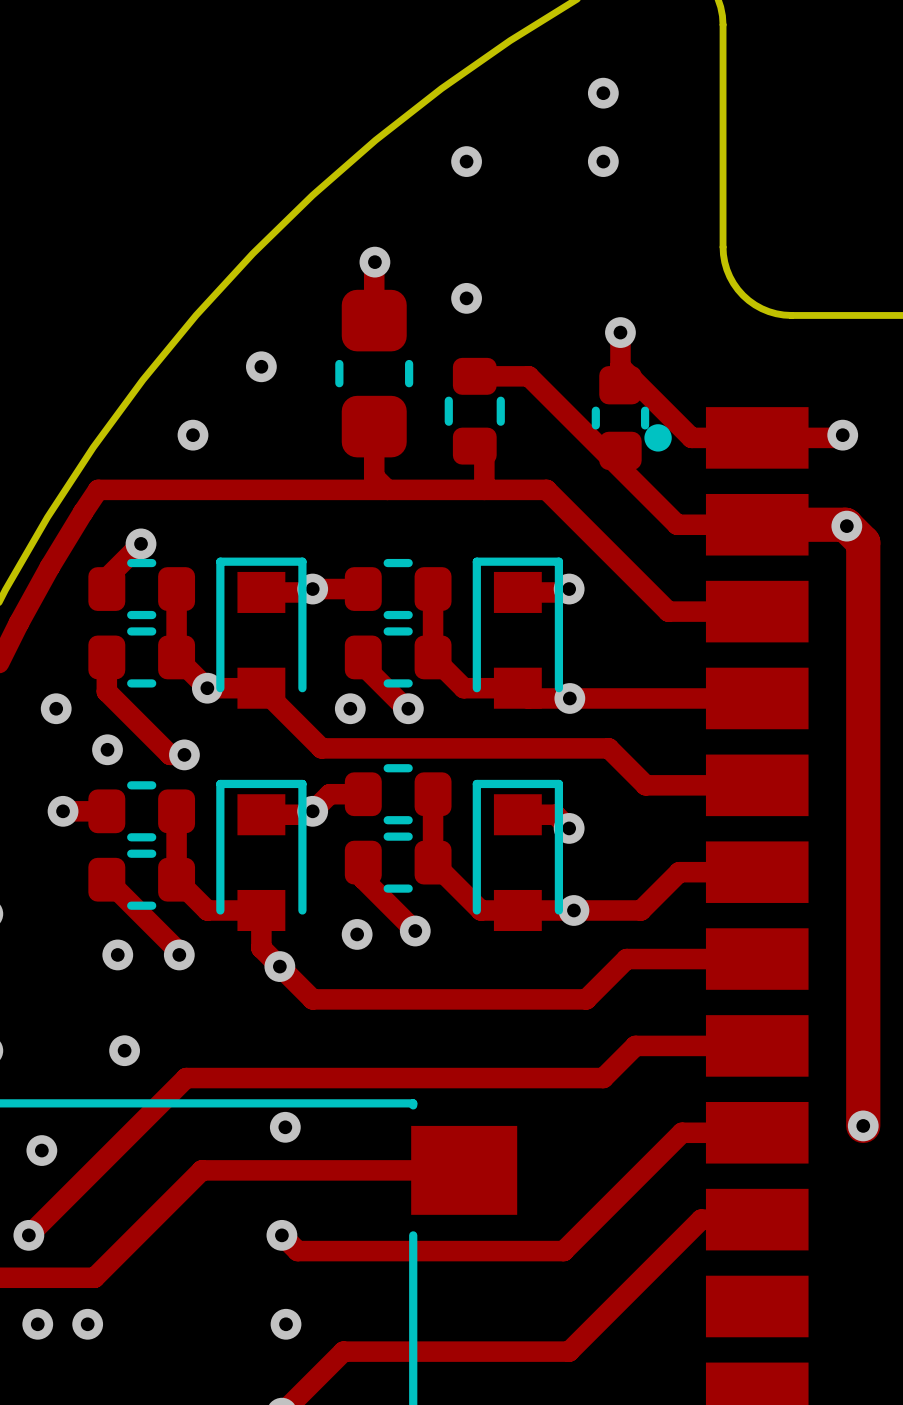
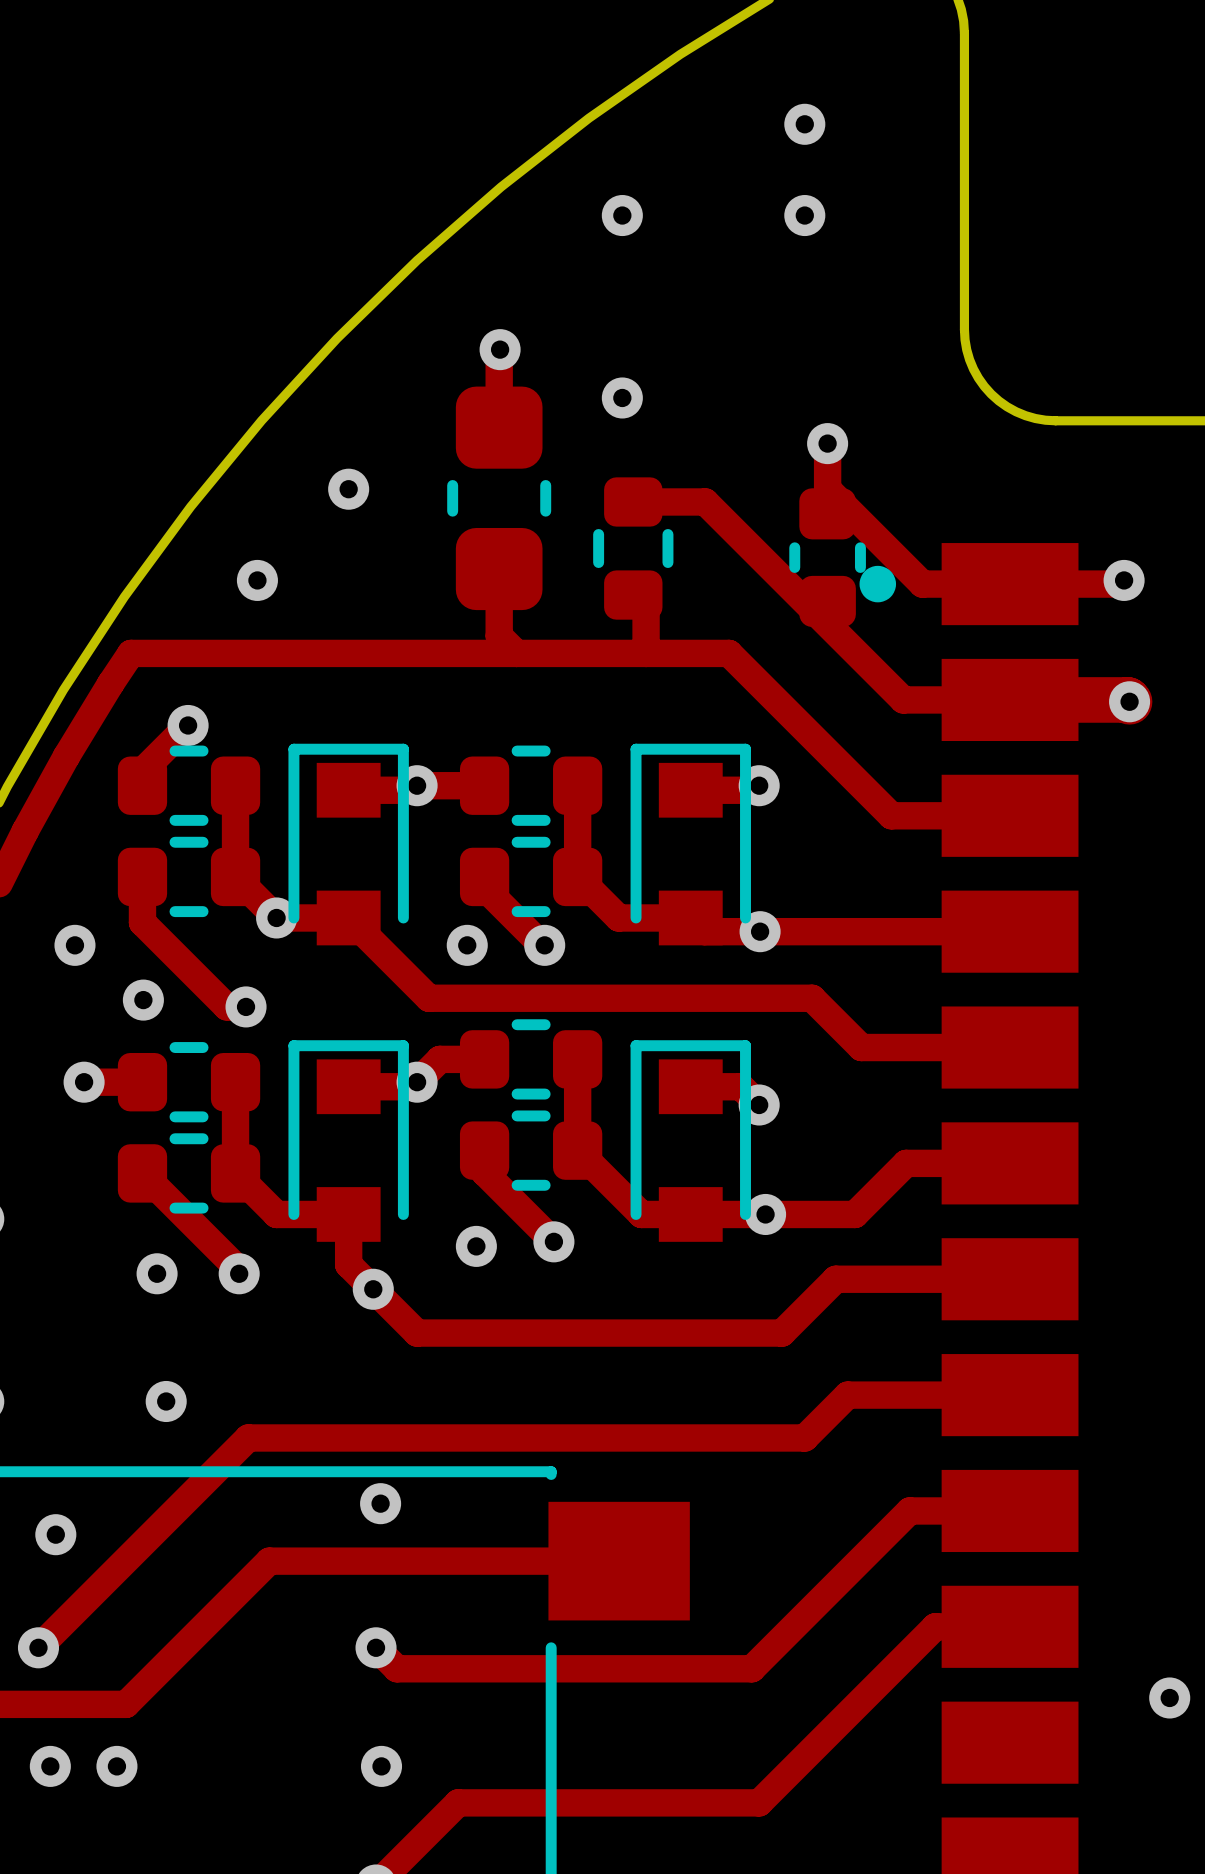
track: (846, 526) (863, 542) (863, 1125) -> none
via: (863, 1125) -> none
via: none -> (1169, 1697)

